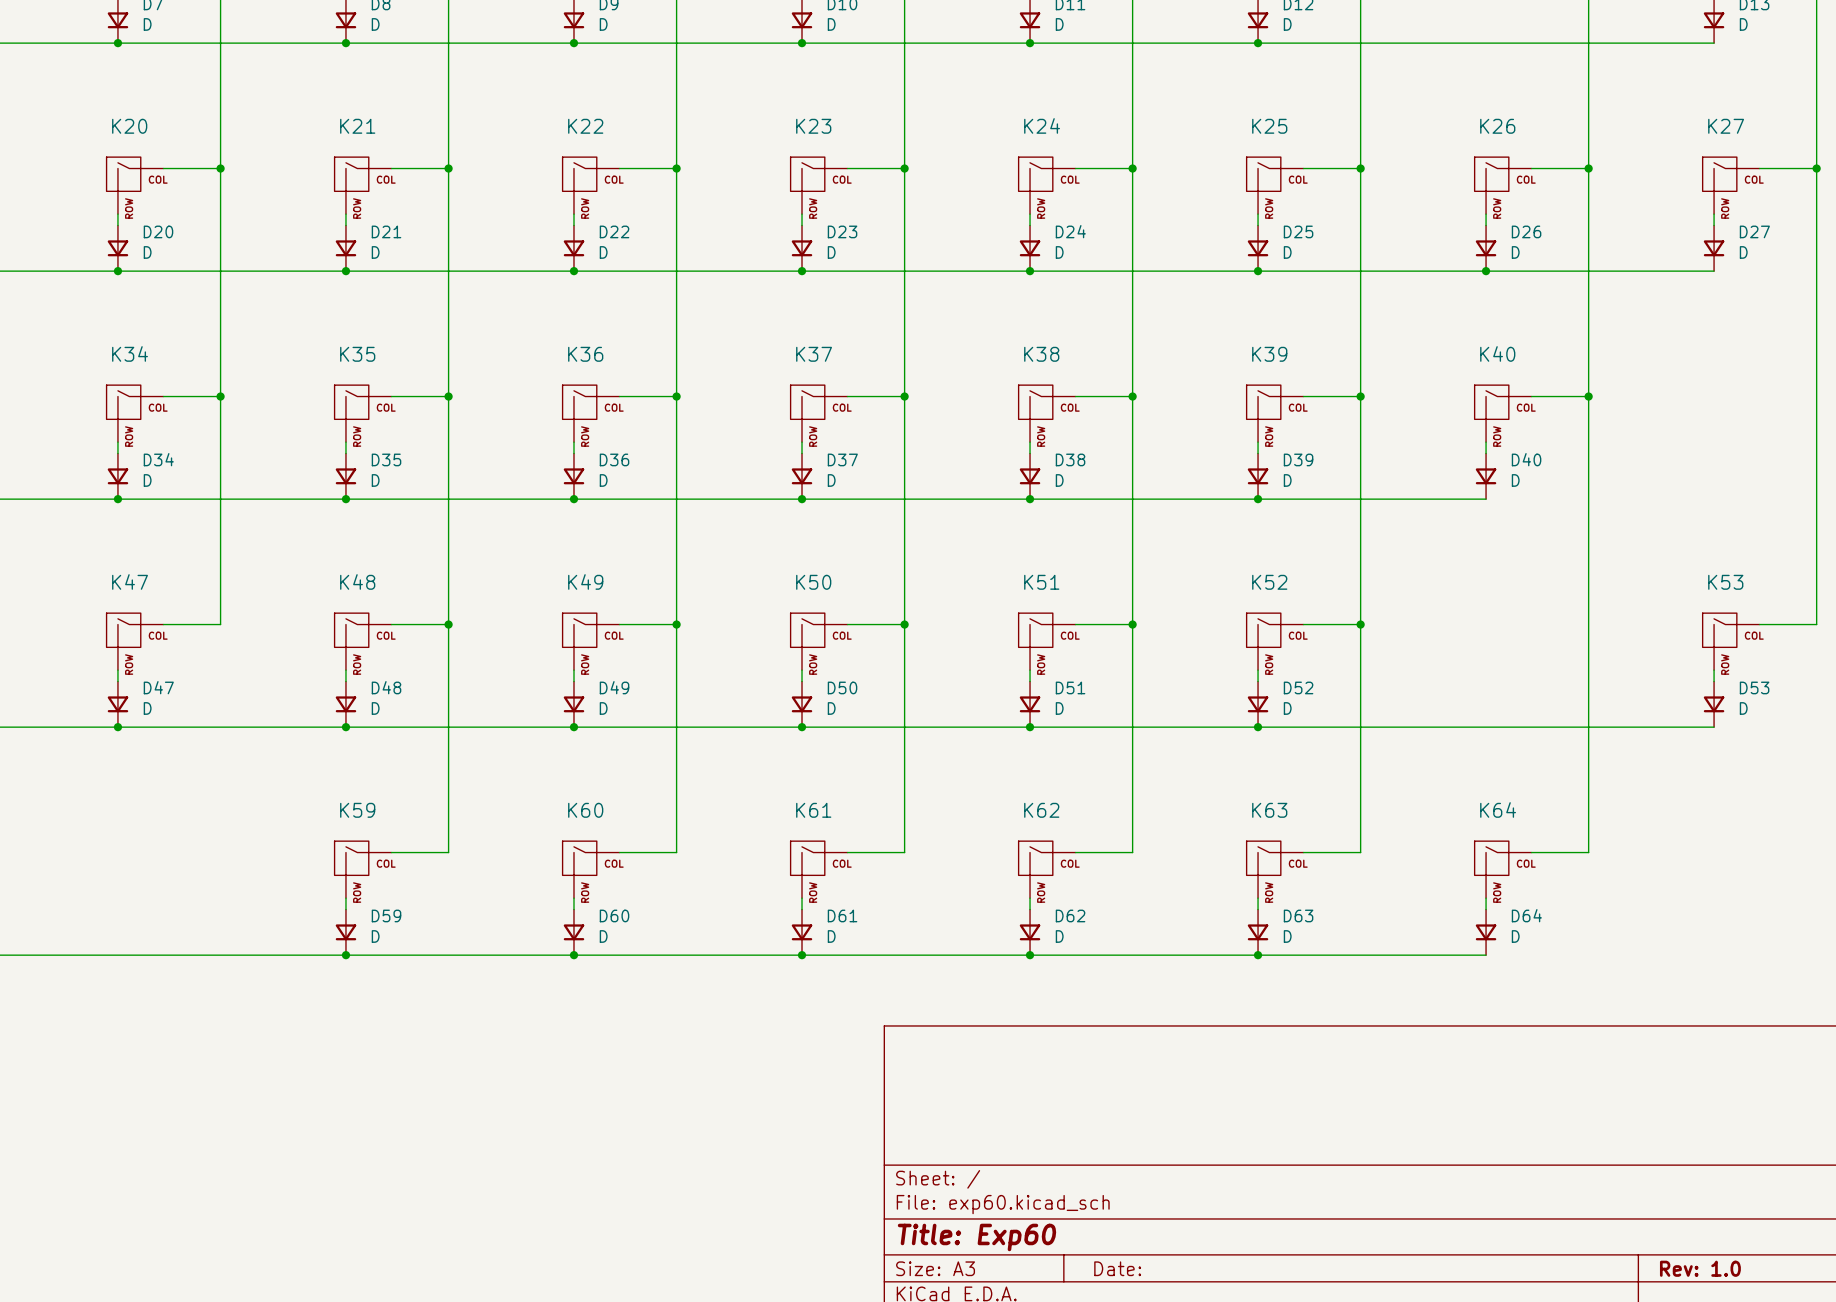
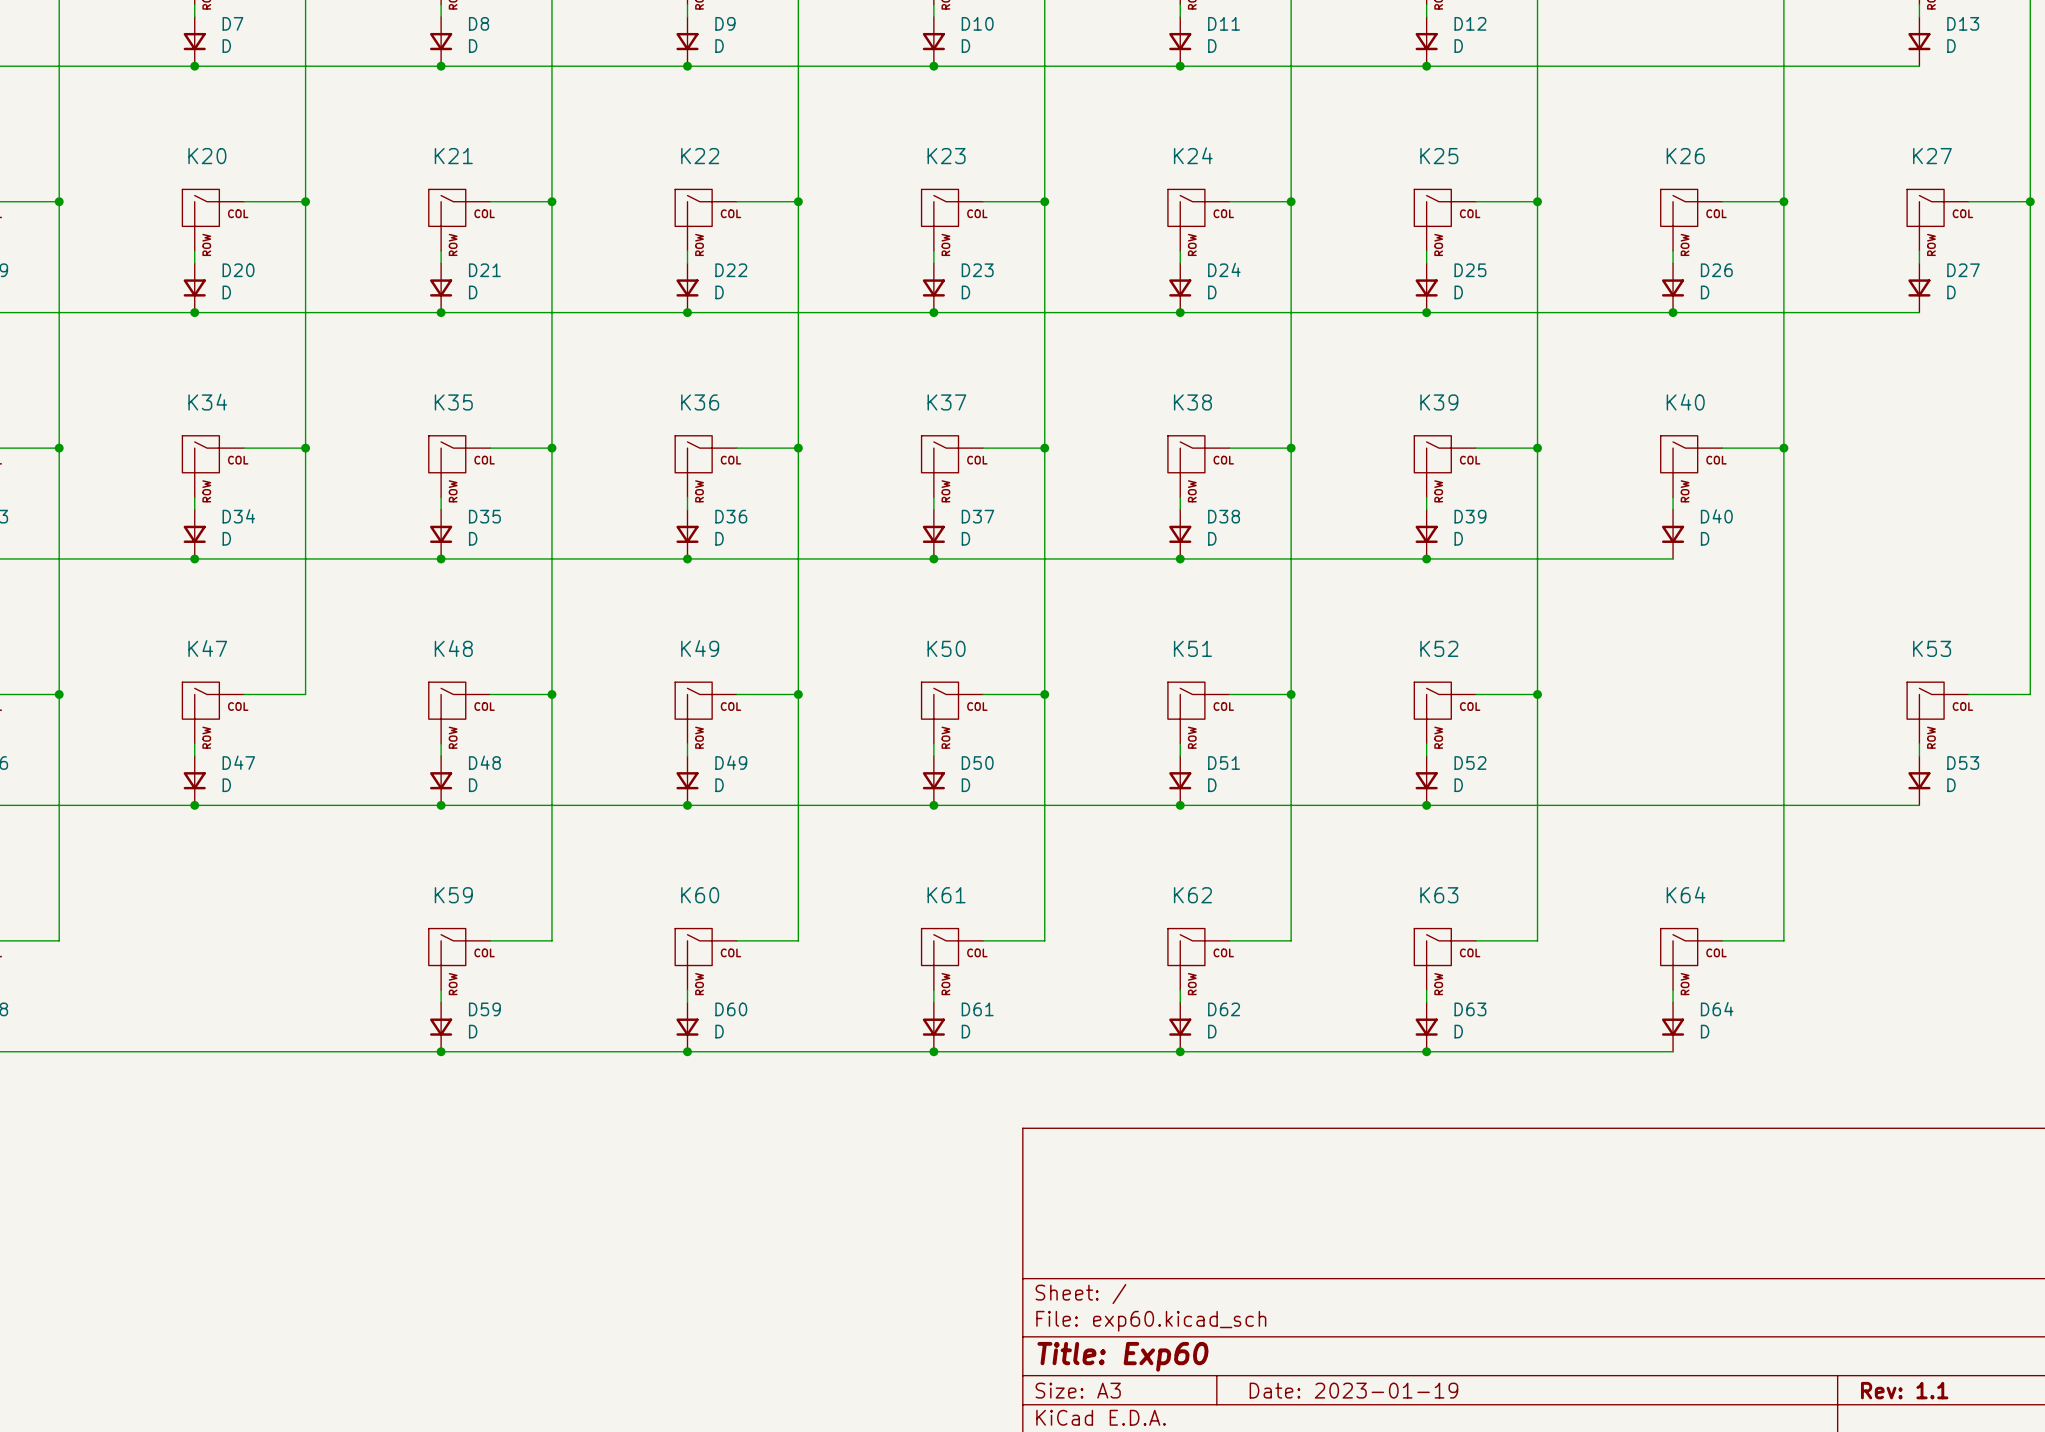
title block: Date: (1117, 1268) -> Date: 2023-01-19 (1353, 1390)
title block: Rev: 1.0 (1700, 1268) -> Rev: 1.1 (1904, 1390)

